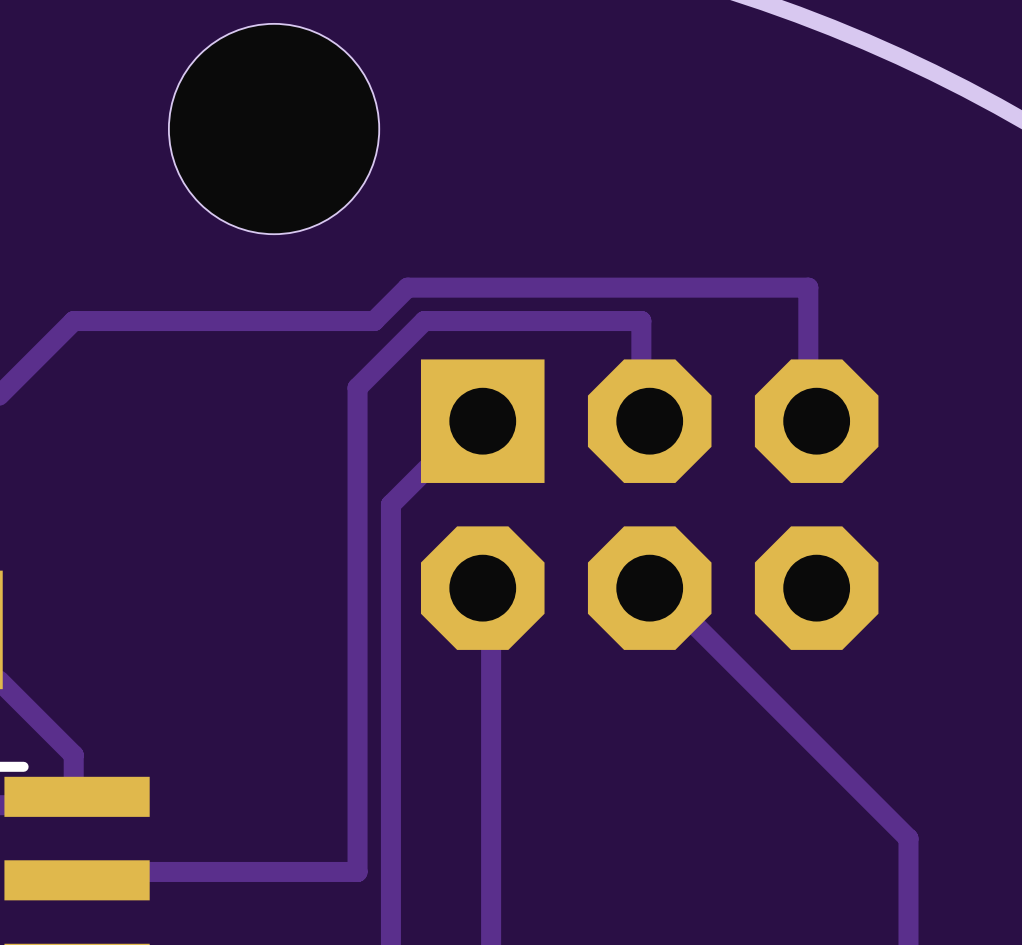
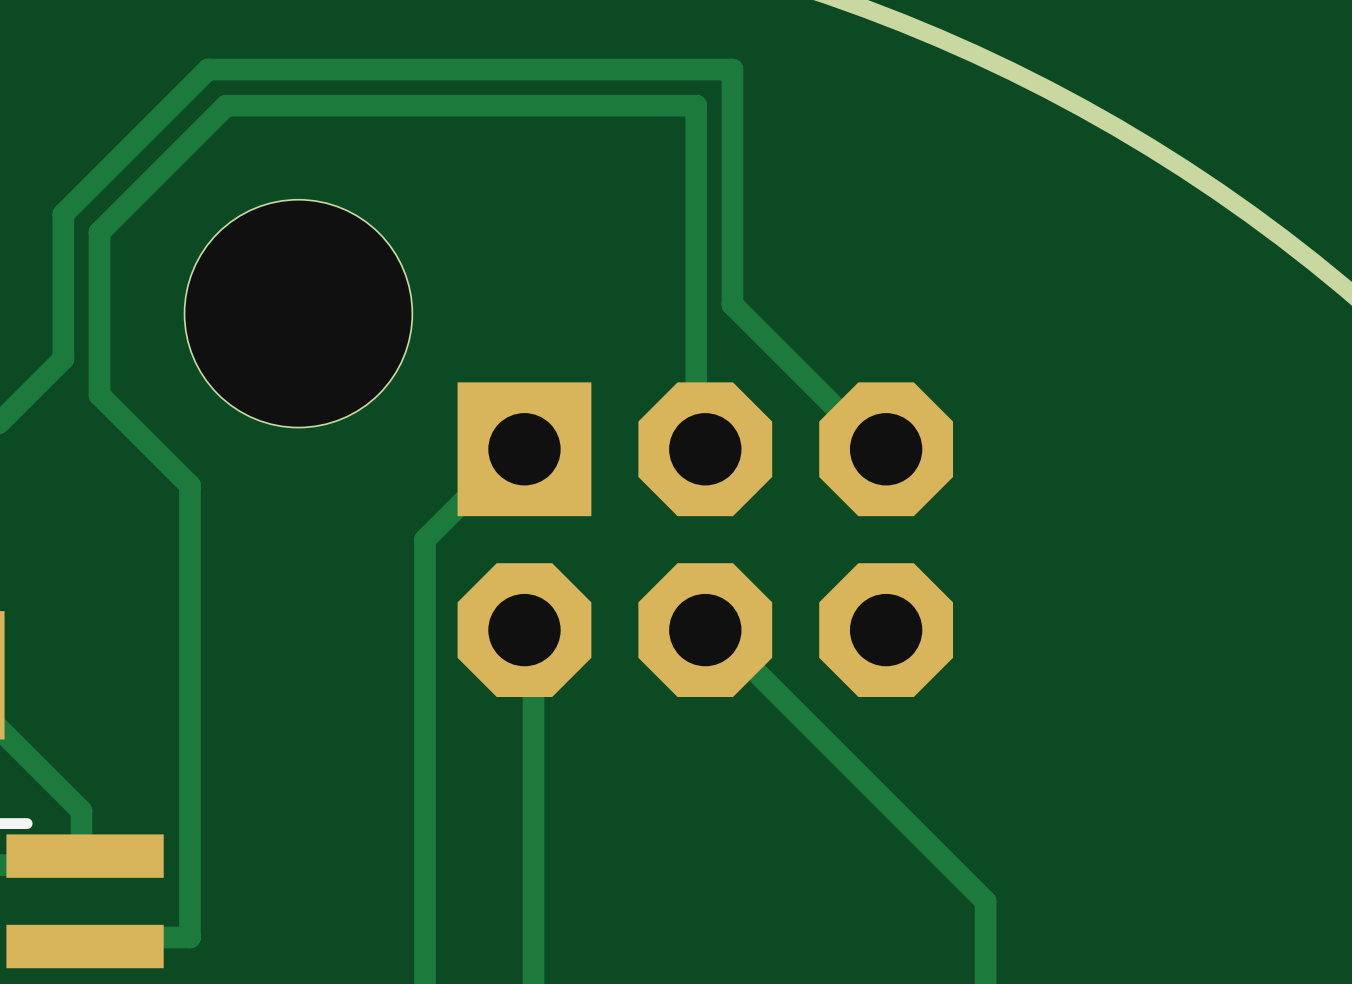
hole position: (274, 129) -> (298, 313)
track: (641, 321) (424, 321) (357, 387) (357, 871) (173, 871) -> (696, 340) (696, 105) (226, 105) (99, 232) (99, 395) (189, 485) (189, 937)
track: (57, 337) (73, 321) (374, 321) (407, 287) (808, 287) (808, 421) -> (63, 358) (63, 214) (208, 69) (732, 69) (732, 304) (877, 449)

